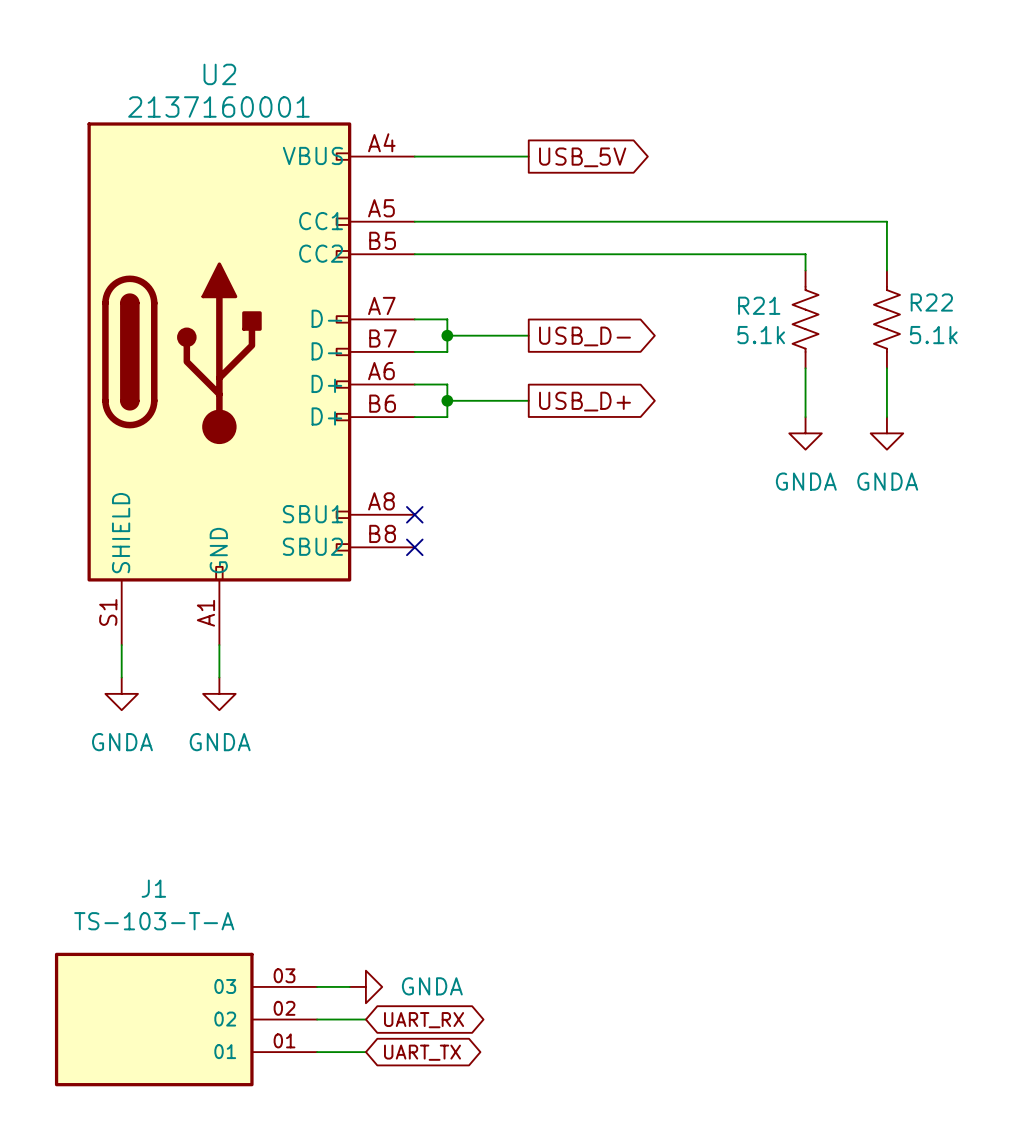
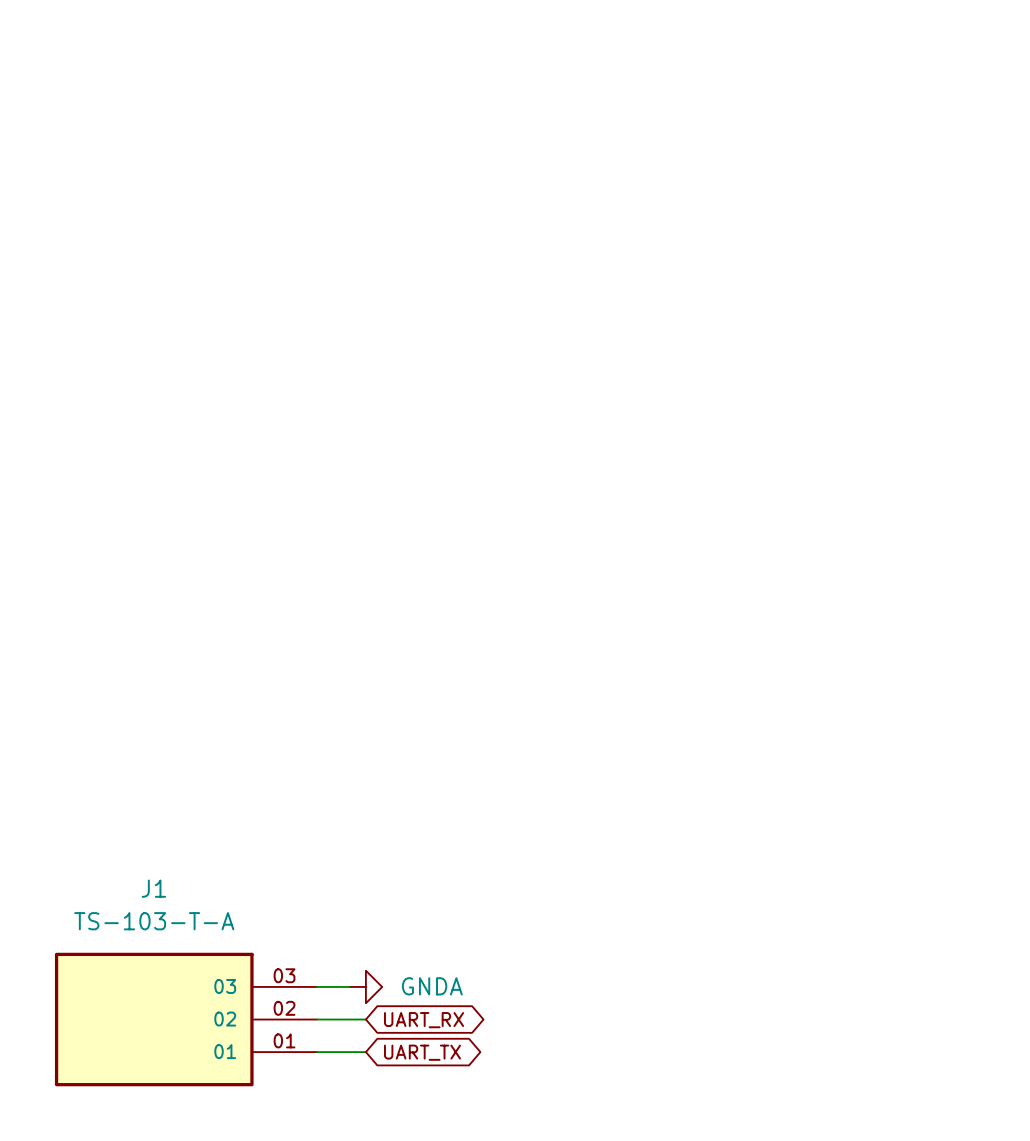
wire: (414, 156) (528, 156) -> none
global label: USB_5V (582, 157) -> none
wire: (414, 221) (886, 221) (886, 270) -> none
wire: (414, 254) (805, 254) (805, 270) -> none
wire: (414, 319) (447, 319) (447, 351) (414, 351) -> none
R21: 5.1k (805, 319) -> none
R22: 5.1k (886, 319) -> none
wire: (447, 335) (528, 335) -> none
junction: (447, 335) -> none
global label: USB_D- (584, 336) -> none
wire: (805, 368) (805, 417) -> none
wire: (886, 368) (886, 417) -> none
U2: 2137160001 (251, 383) -> none
wire: (414, 384) (447, 384) (447, 417) (414, 417) -> none
wire: (447, 400) (528, 400) -> none
junction: (447, 400) -> none
global label: USB_D+ (584, 401) -> none
power symbol: GNDA (805, 433) -> none
power symbol: GNDA (886, 433) -> none
no-connect mark: (414, 514) -> none
no-connect mark: (414, 547) -> none
wire: (121, 645) (121, 677) -> none
wire: (219, 645) (219, 677) -> none
power symbol: GNDA (121, 693) -> none
power symbol: GNDA (219, 693) -> none

